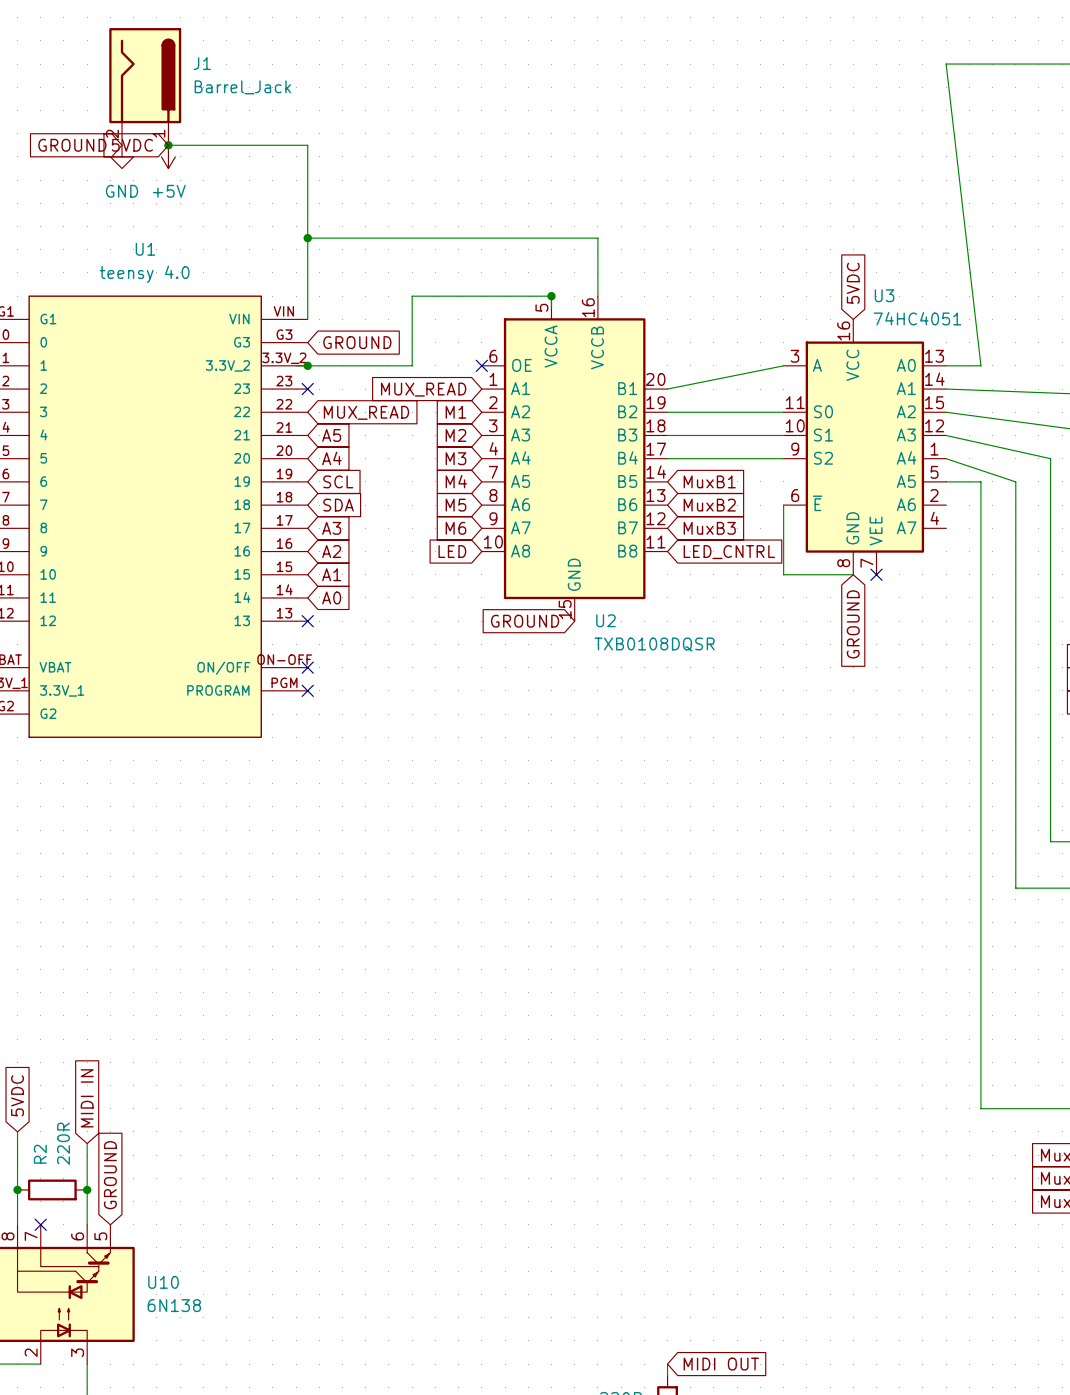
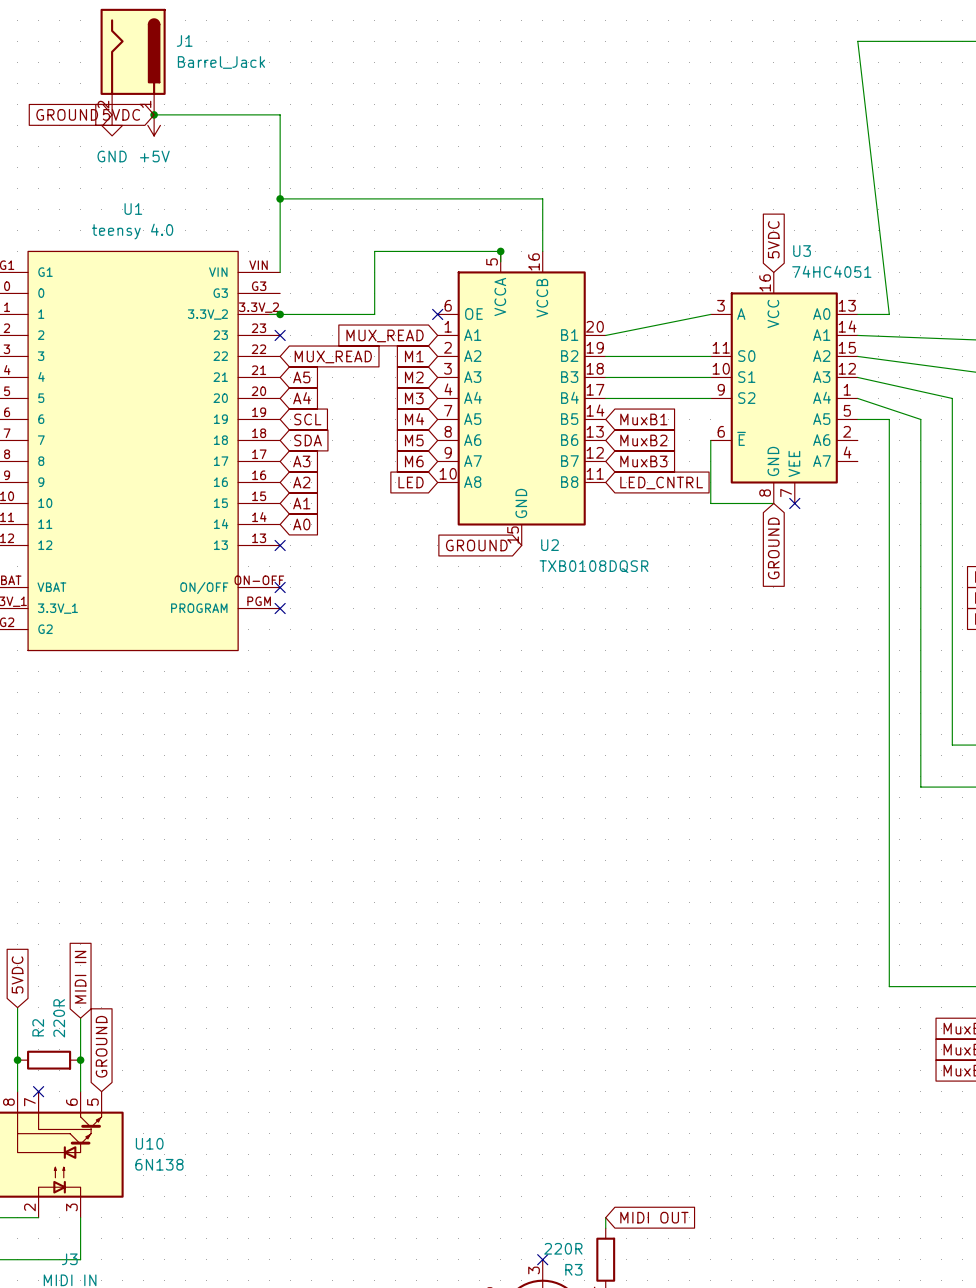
global label: GROUND (357, 342) -> none

